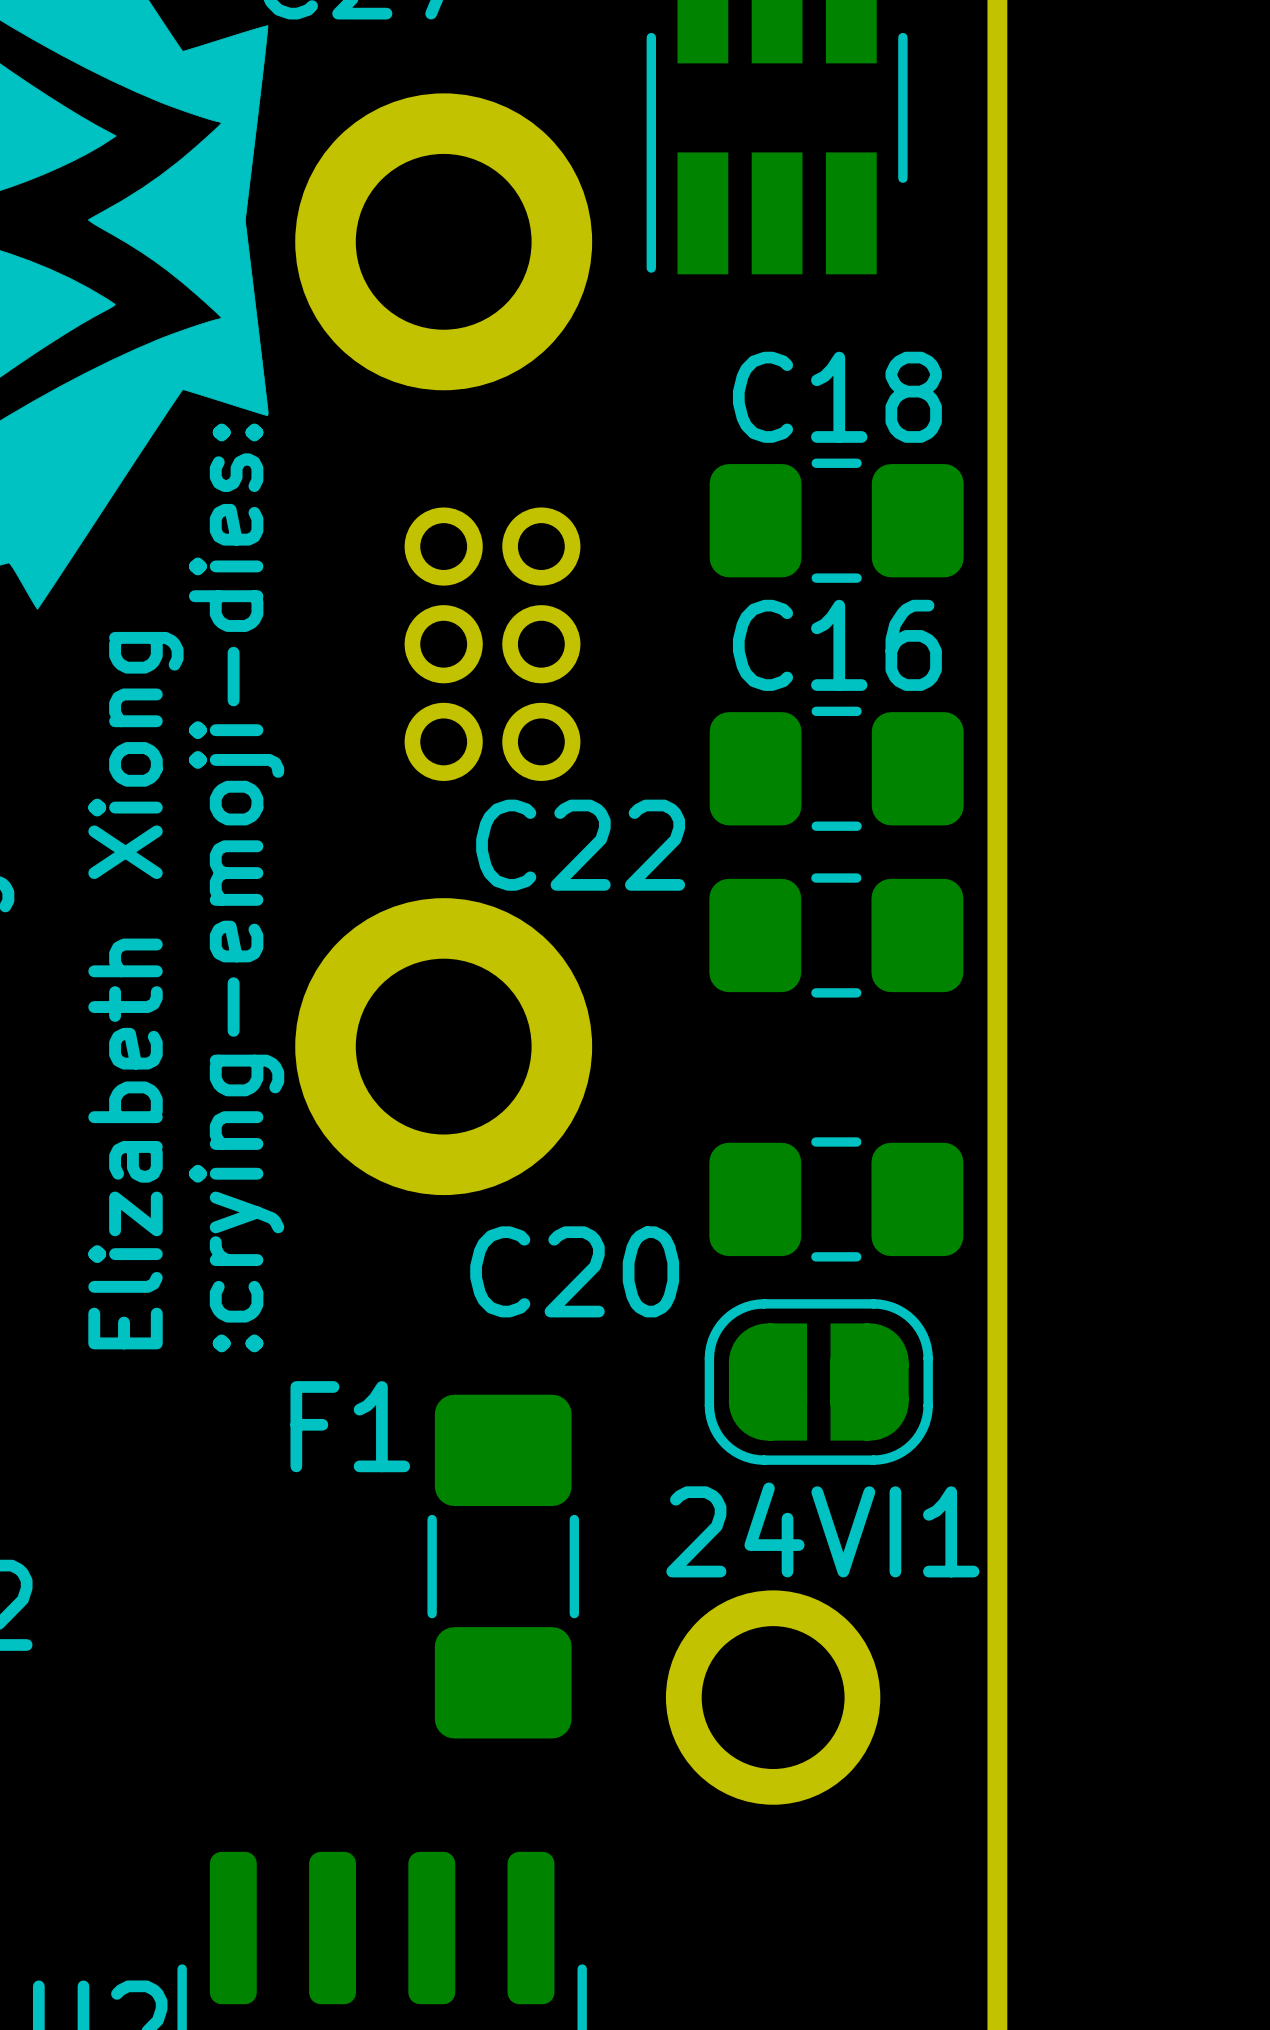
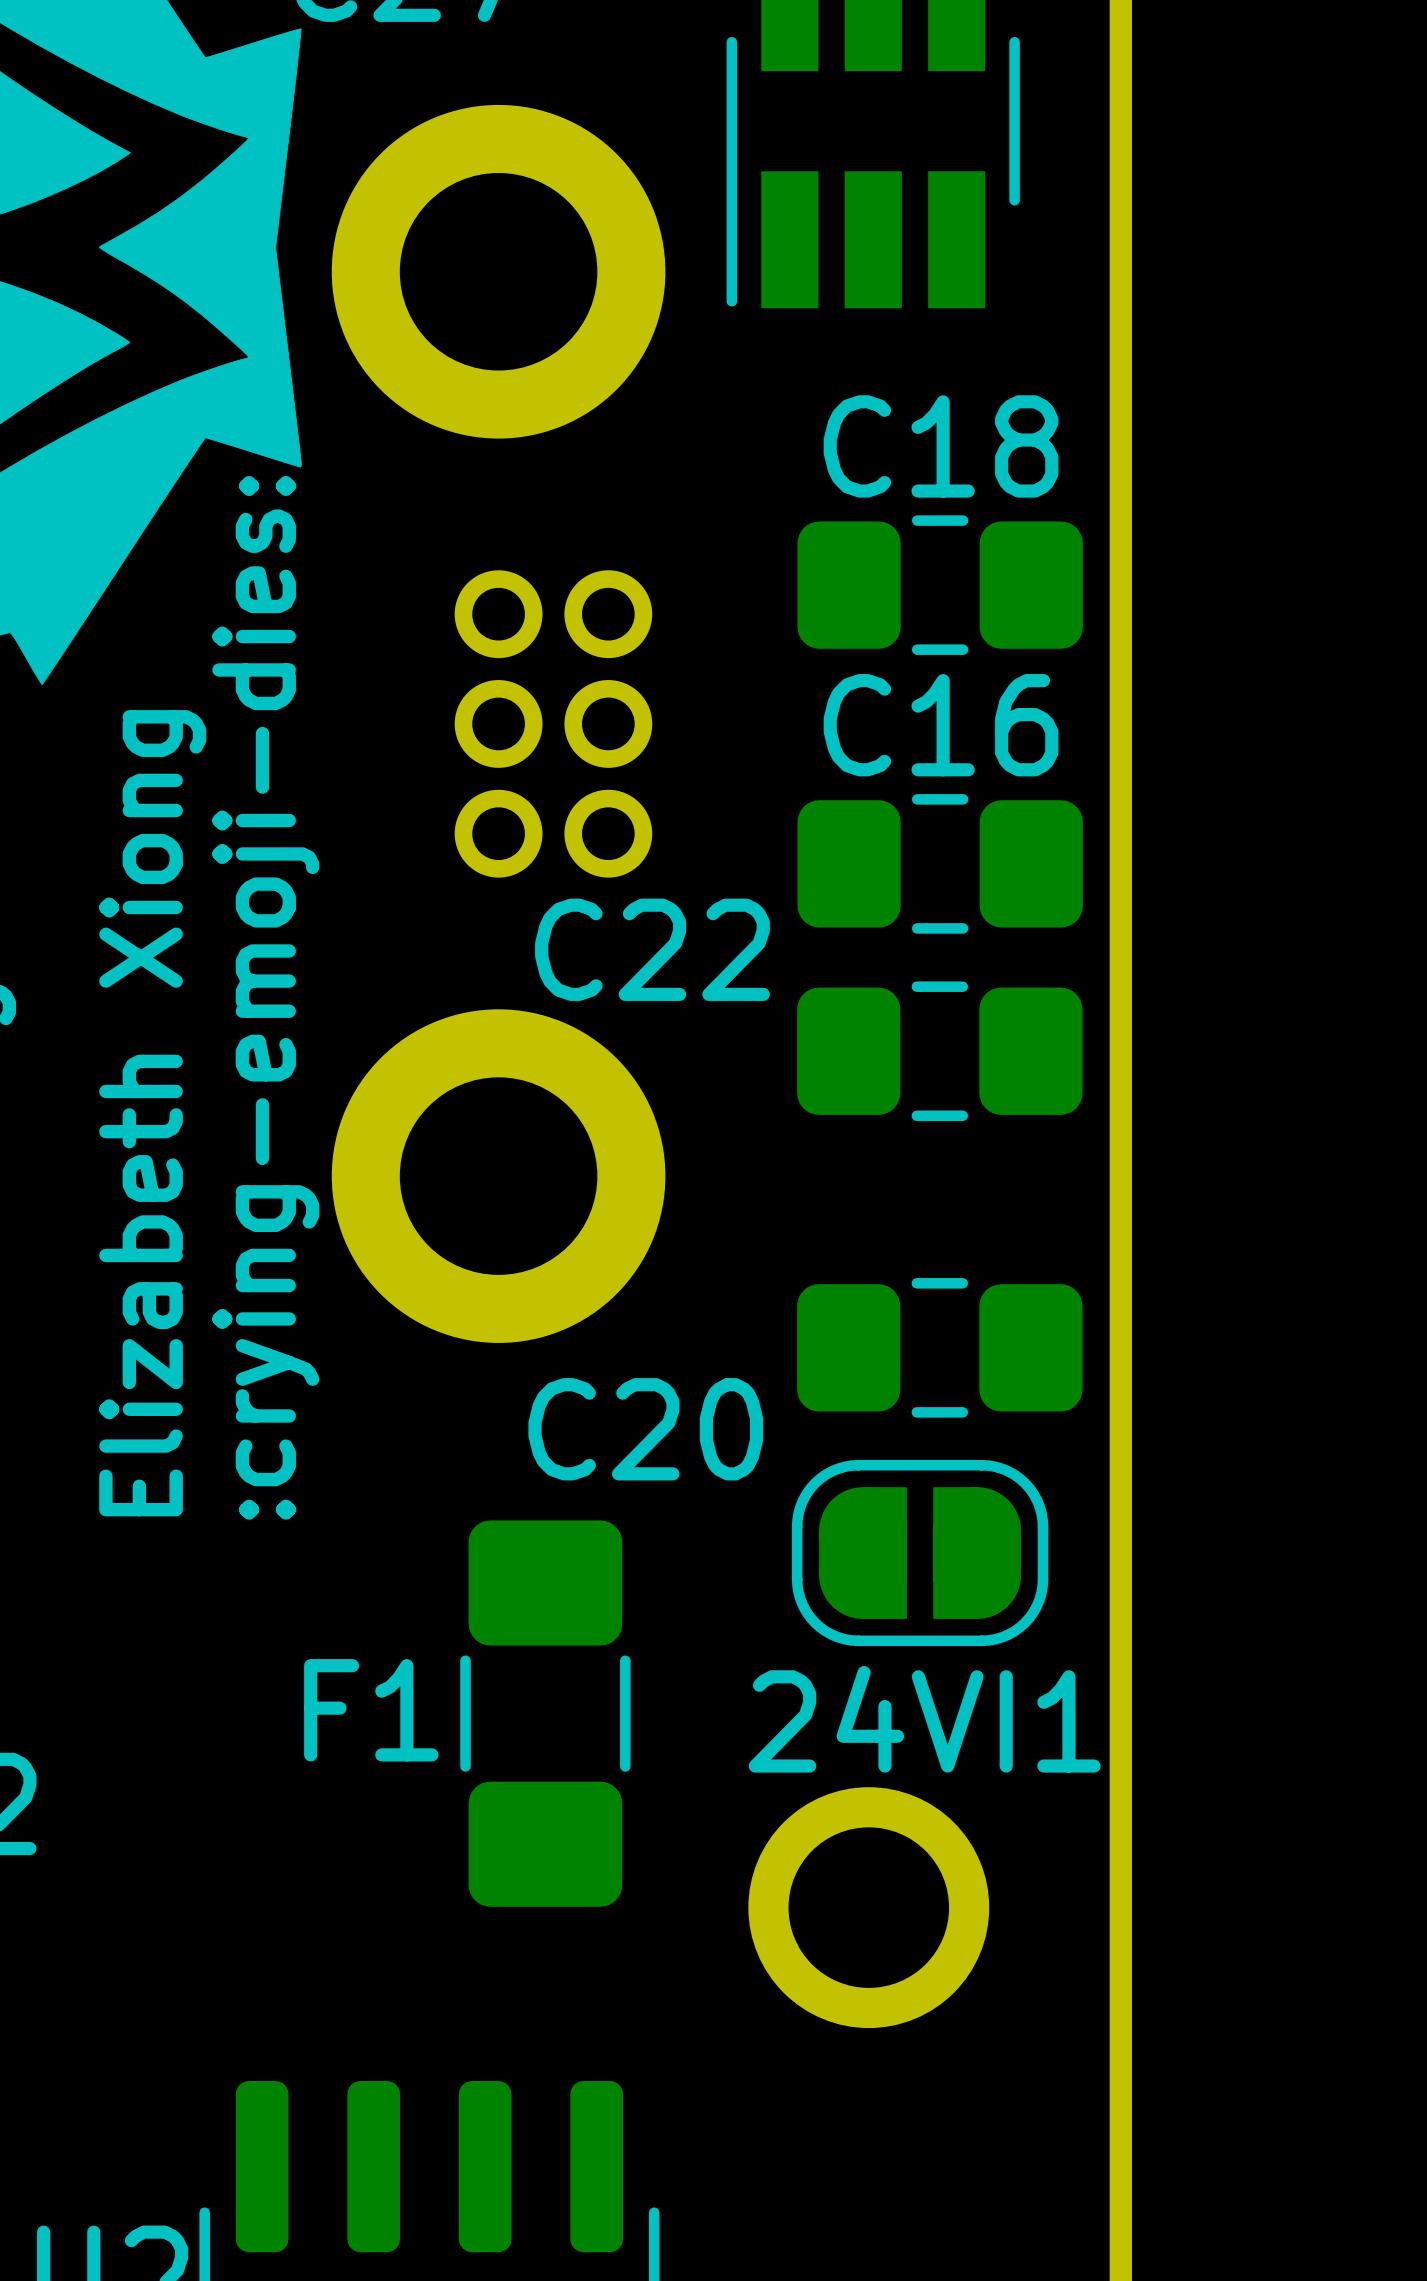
F1 name position: F1 (350, 1426) -> F1 (371, 1710)
F1 position: (503, 1566) -> (545, 1713)

